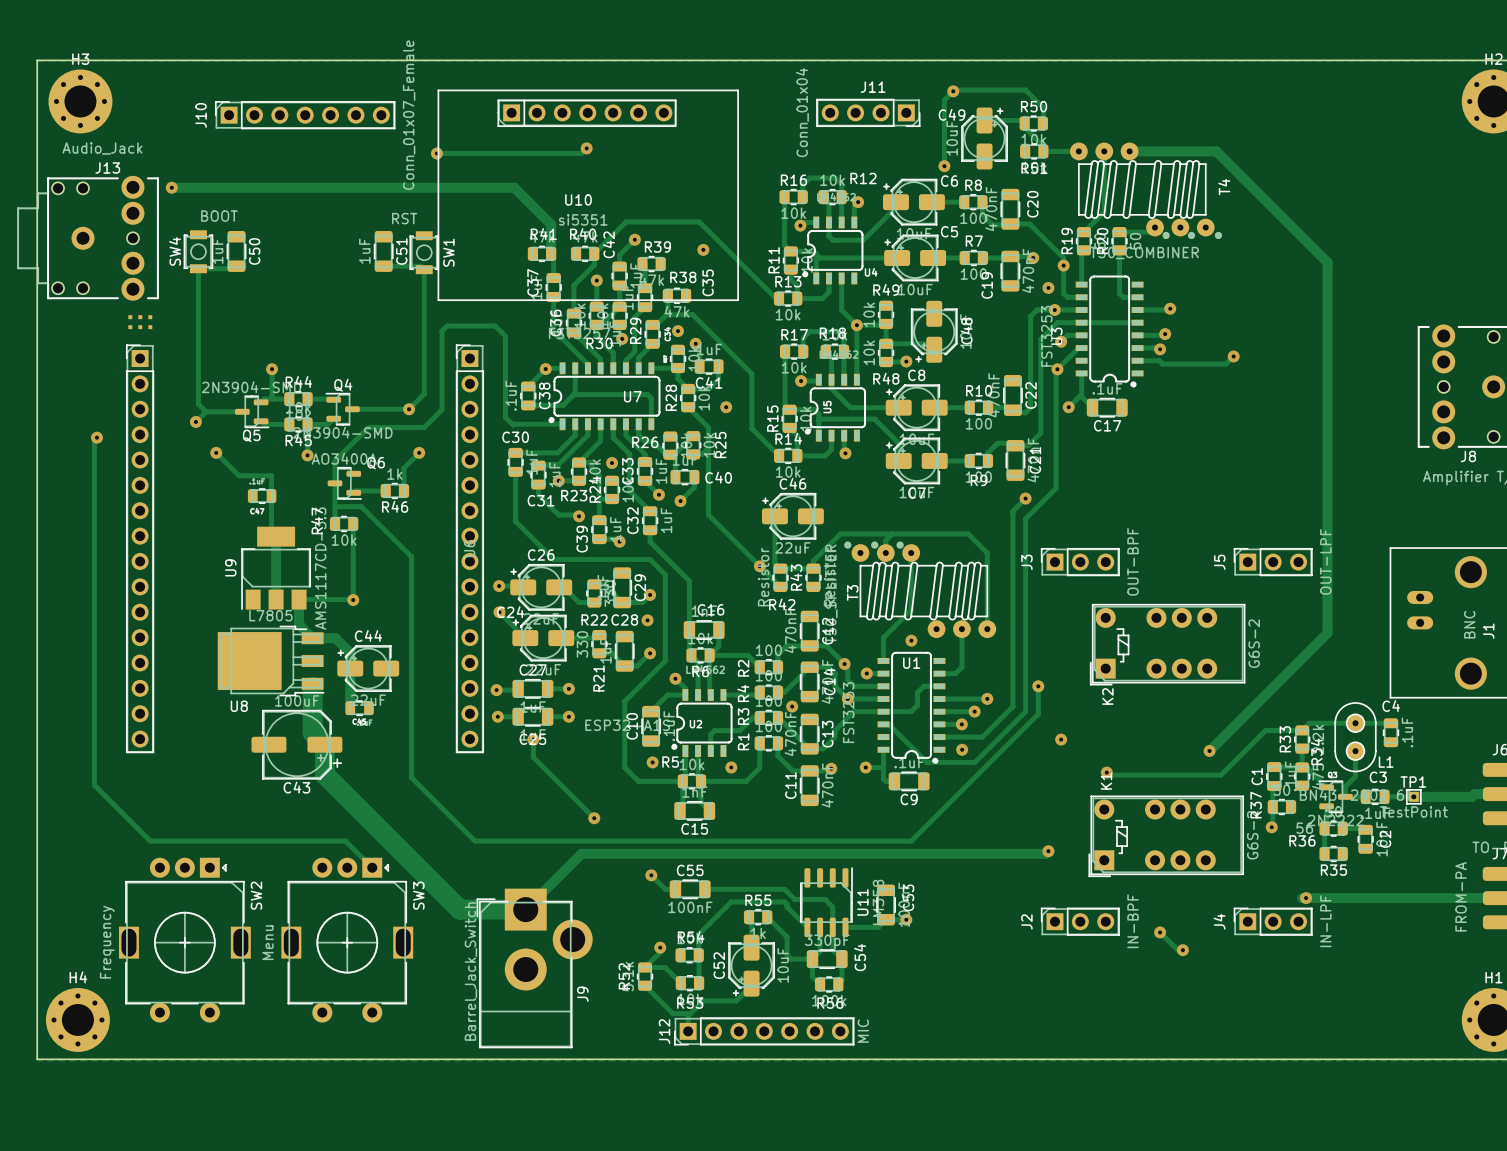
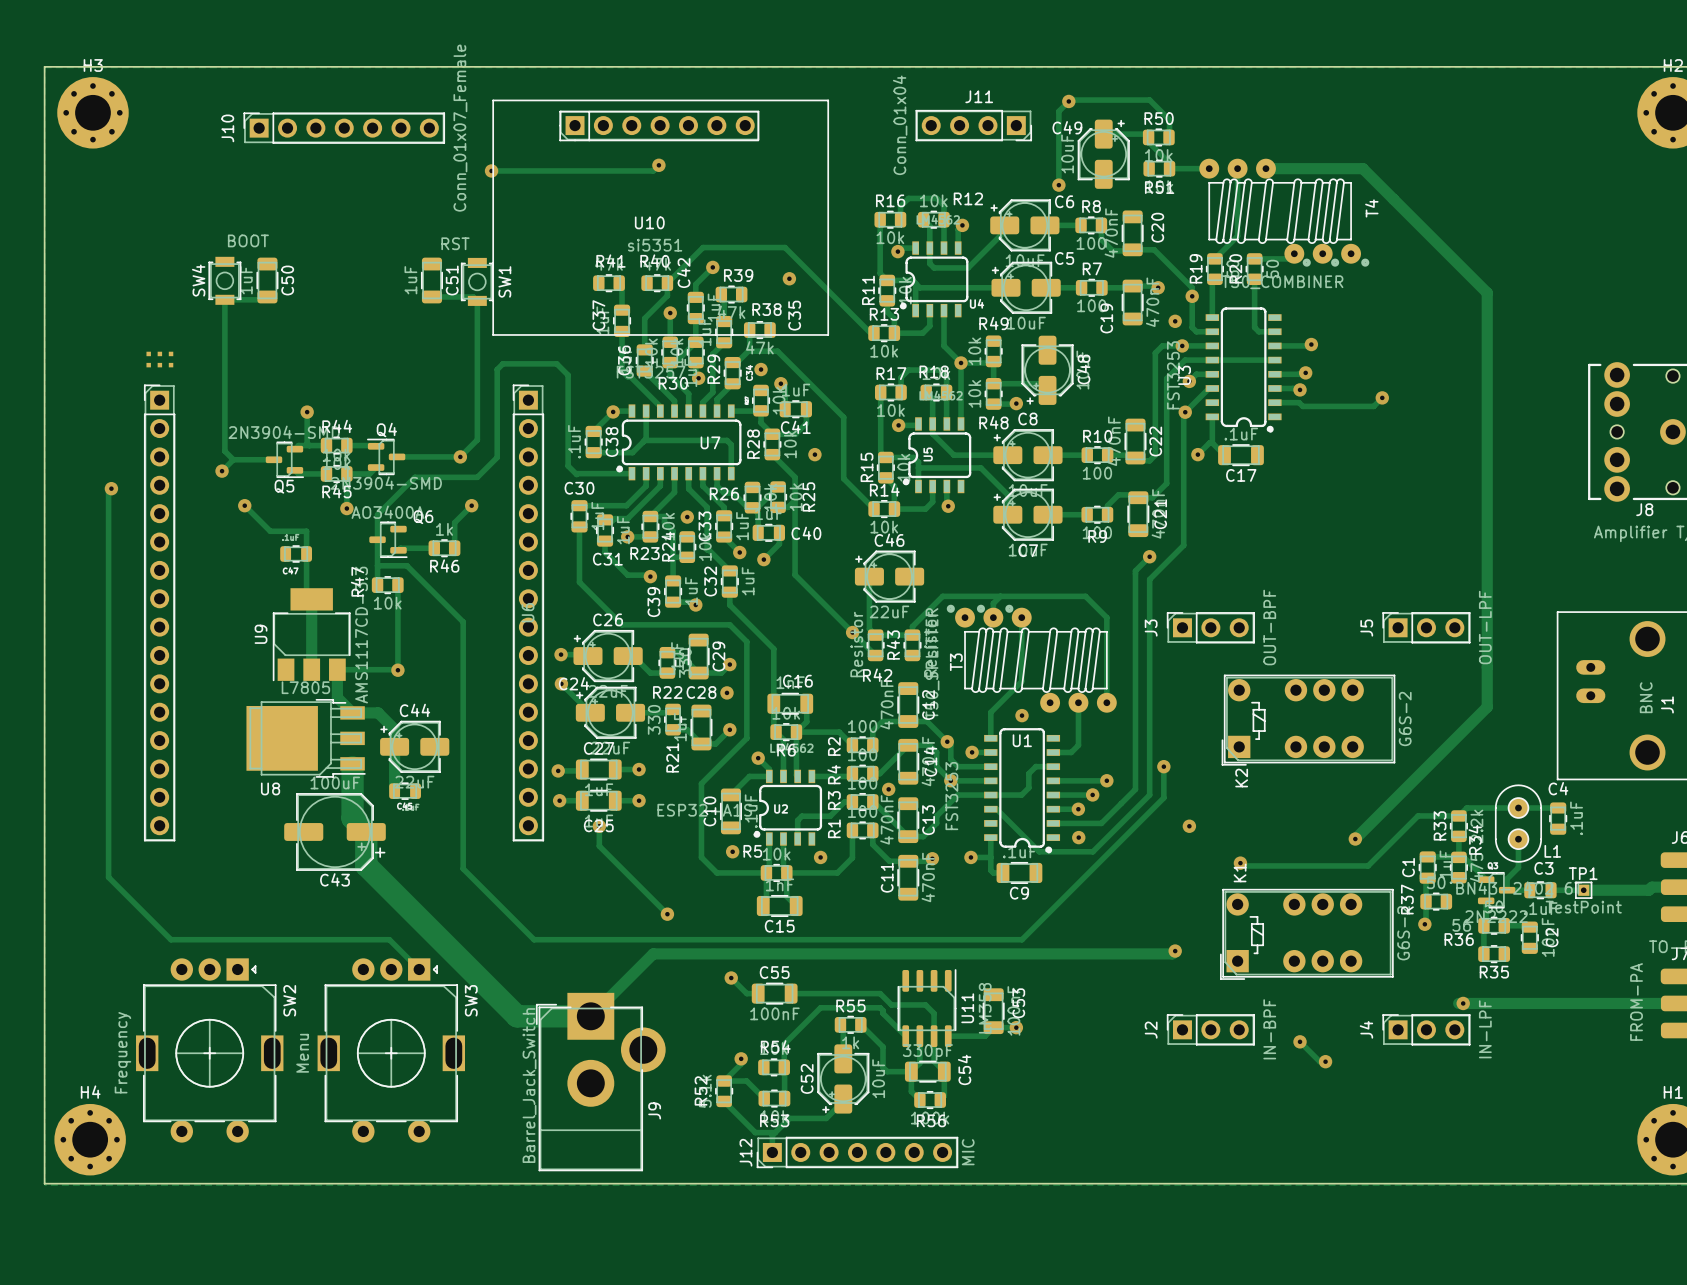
track: (171, 187) (514, 187) (551, 224) (551, 253) -> none
via: (171, 187) -> none
J13: Audio_Jack (88, 238) -> none

